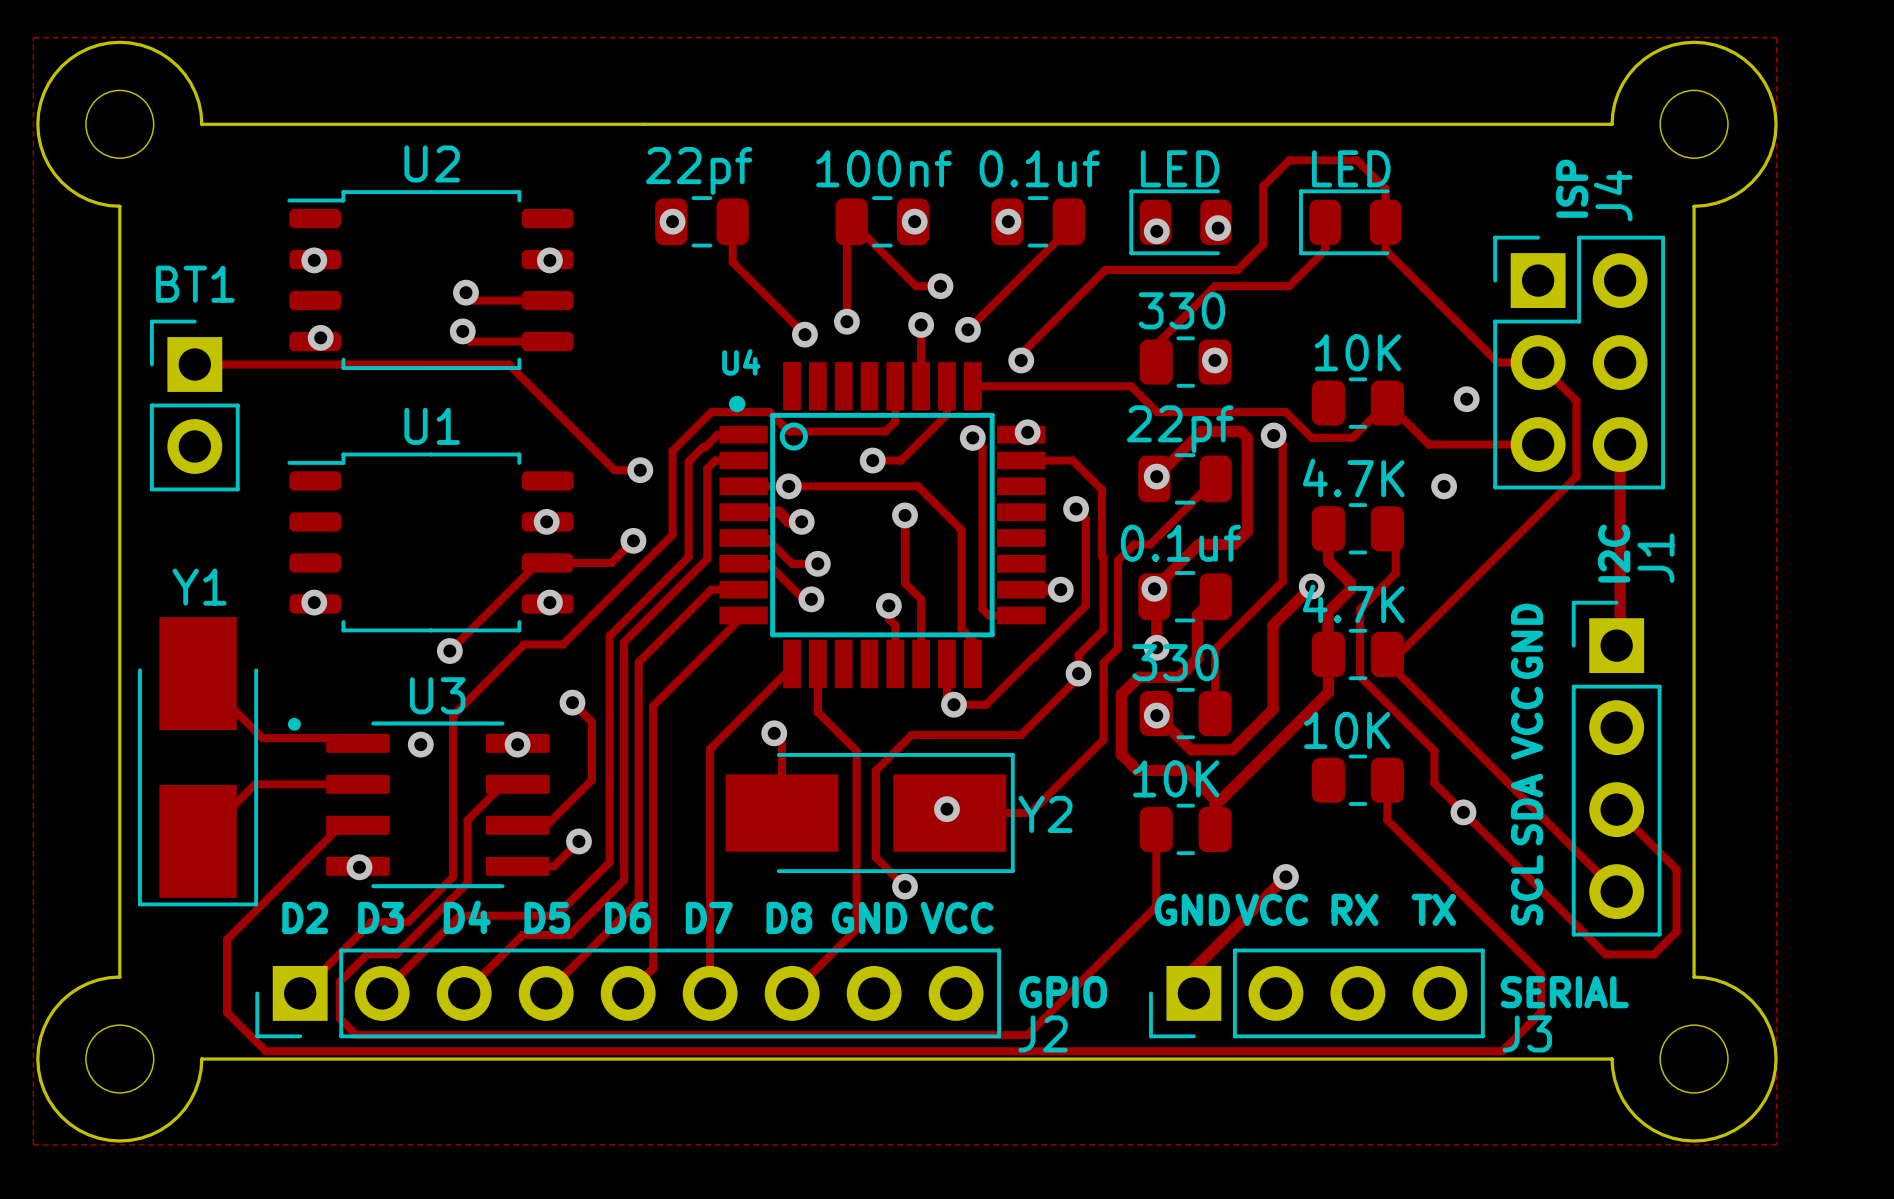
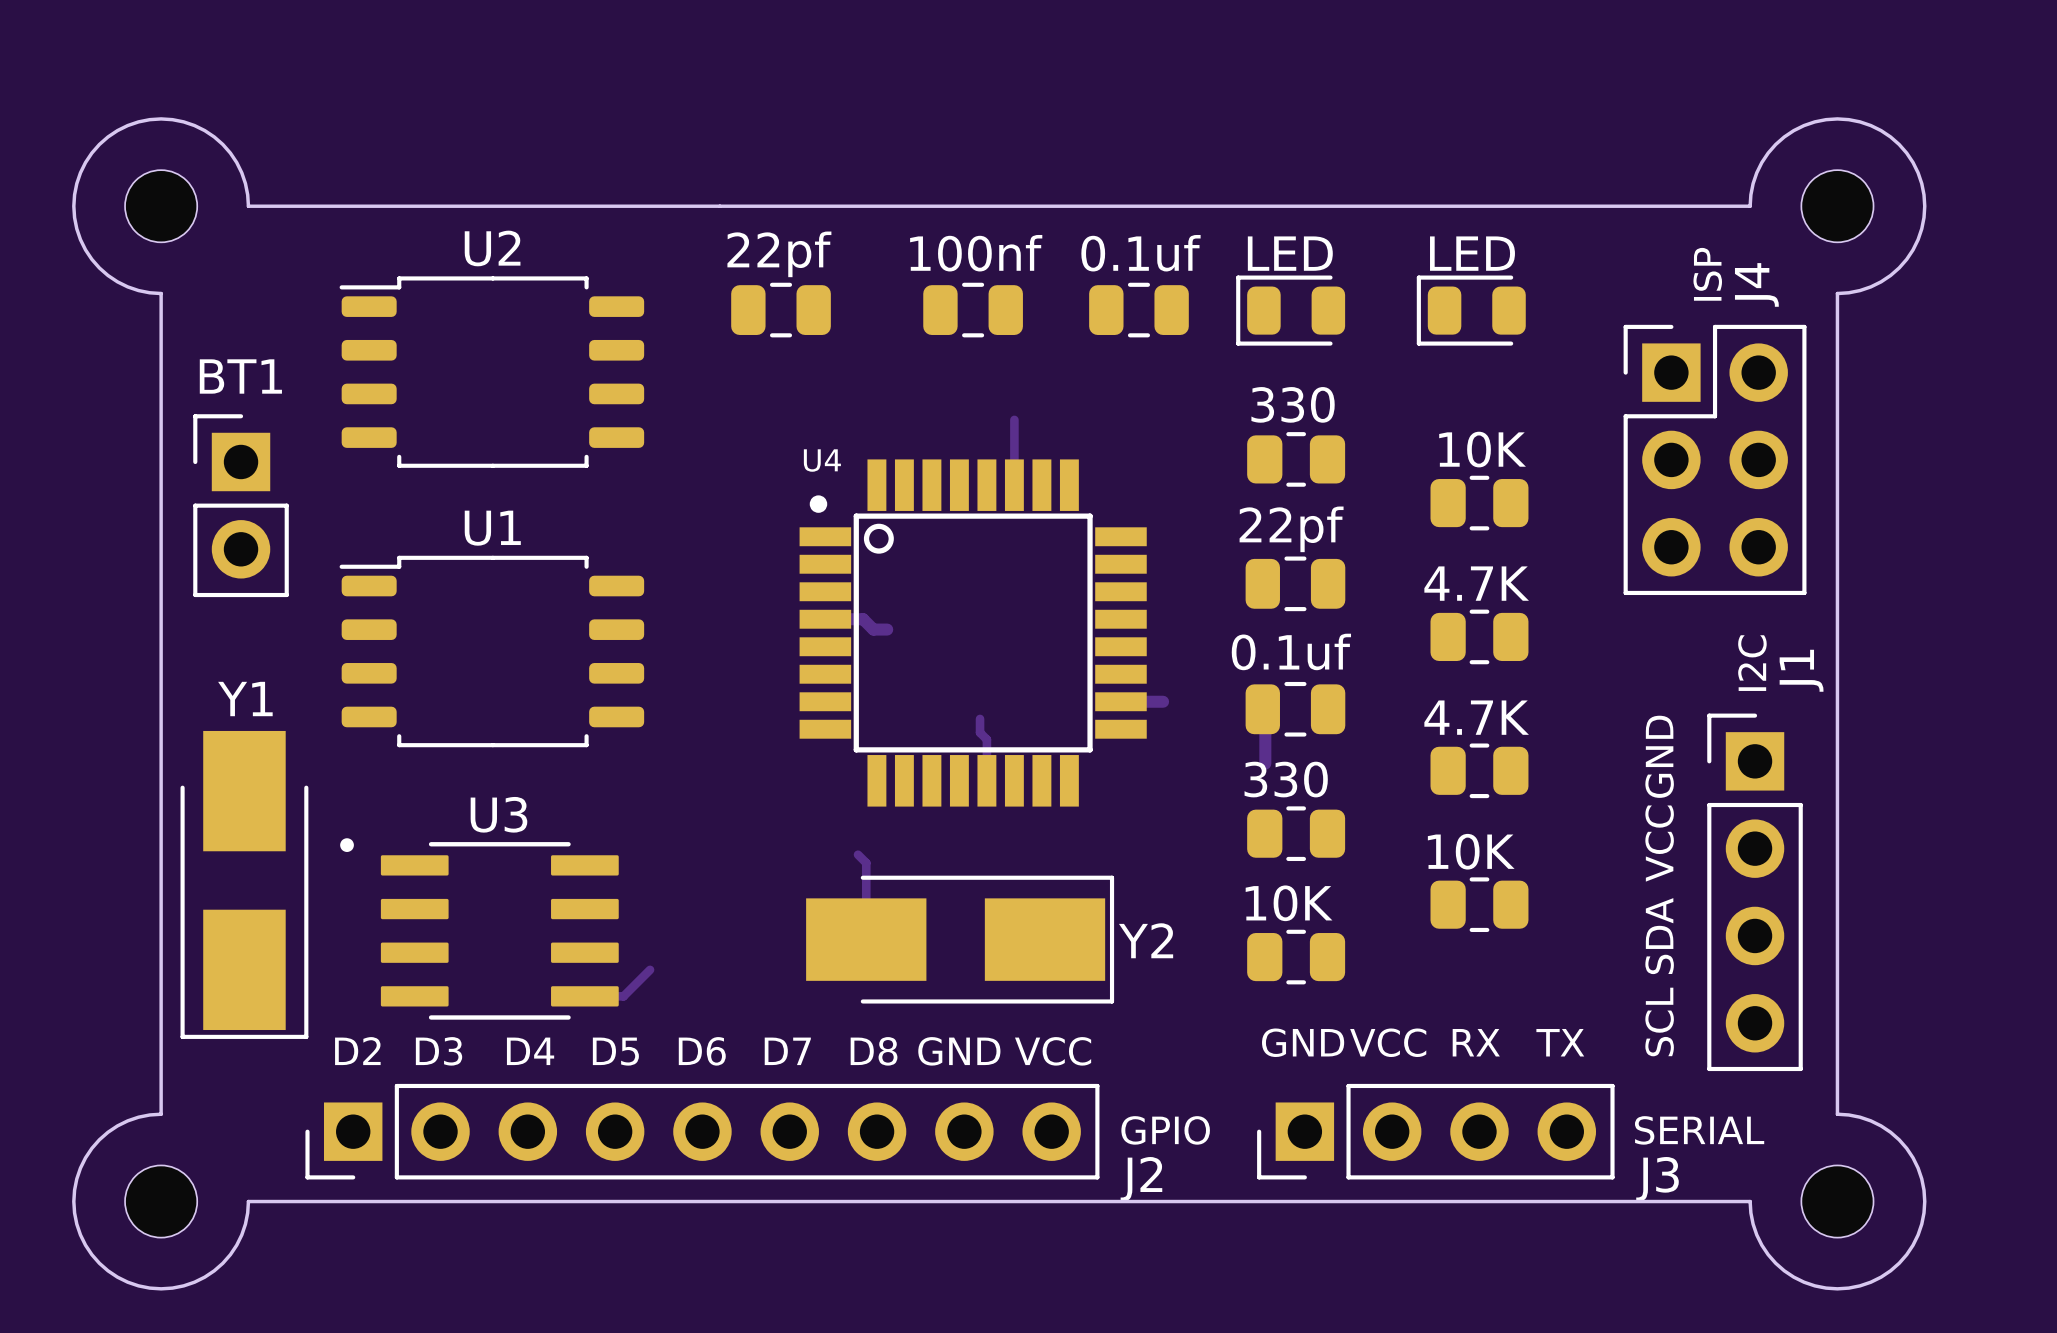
zone outline: (33, 37) (33, 1144) (1776, 1144) (1776, 37) (33, 37) -> none
via: (672, 221) -> none
track: (732, 221) (732, 262) (804, 334) -> none
via: (914, 221) -> none
via: (1008, 221) -> none
track: (1068, 221) (1068, 228) (967, 329) -> none
track: (1325, 222) (1325, 250) (1289, 286) (1214, 286) (1156, 344) (1156, 362) -> none
via: (1218, 228) -> none
via: (1156, 231) -> none
via: (314, 260) -> none
via: (549, 260) -> none
track: (940, 286) (916, 286) (851, 221) (846, 226) (846, 321) -> none
via: (940, 286) -> none
track: (465, 292) (473, 300) (547, 300) -> none
via: (465, 292) -> none
via: (846, 321) -> none
via: (921, 324) -> none
via: (967, 329) -> none
track: (462, 331) (462, 334) (469, 341) (547, 341) -> none
via: (462, 331) -> none
via: (804, 334) -> none
via: (320, 337) -> none
track: (1021, 360) (1021, 354) (1105, 270) (1237, 270) (1263, 244) (1263, 186) (1289, 160) (1356, 160) (1385, 189) (1385, 250) (1497, 362) (1538, 362) (1576, 400) (1576, 476) (1398, 654) (1387, 654) (1387, 662) (1616, 891) -> none
via: (1021, 360) -> none
via: (1214, 360) -> none
track: (194, 364) (508, 364) (614, 470) (640, 470) -> none
track: (895, 386) (895, 421) (885, 431) (788, 431) (769, 412) (711, 412) (672, 450) (672, 534) (562, 644) (524, 644) (453, 715) (453, 876) (407, 922) (371, 922) (300, 993) -> none
track: (946, 386) (946, 414) (900, 460) (872, 460) -> none
track: (972, 386) (1131, 386) (1157, 412) (1285, 412) (1311, 437) (1352, 437) (1387, 403) (1428, 444) (1538, 444) -> none
via: (1466, 399) -> none
via: (1027, 432) -> none
track: (743, 434) (717, 434) (688, 461) (688, 557) (609, 636) (609, 862) (556, 915) (459, 915) (382, 993) -> none
track: (1273, 435) (1282, 444) (1282, 581) (1215, 649) (1215, 713) -> none
via: (1273, 435) -> none
track: (972, 437) (982, 447) (982, 609) (988, 615) (1021, 615) -> none
via: (972, 437) -> none
track: (1620, 444) (1620, 642) (1616, 645) -> none
track: (743, 460) (715, 460) (707, 468) (707, 558) (624, 642) (624, 880) (569, 935) (522, 935) (464, 993) -> none
via: (872, 460) -> none
track: (1021, 460) (1072, 460) (1101, 489) (1103, 630) (1078, 654) (1078, 677) (1021, 734) (911, 734) (875, 770) (875, 857) (905, 886) -> none
via: (640, 470) -> none
via: (1156, 476) -> none
track: (1154, 478) (1201, 431) (1240, 431) (1247, 437) (1247, 531) (1234, 544) (1198, 544) (1154, 588) (1154, 596) -> none
track: (1215, 478) (1150, 544) (1134, 544) (1118, 560) (1118, 648) (1103, 663) (1103, 739) (1030, 813) (949, 813) -> none
track: (743, 486) (917, 486) (961, 529) (961, 629) (972, 640) (972, 663) -> none
via: (788, 486) -> none
via: (1444, 486) -> none
track: (1076, 508) (1085, 518) (1085, 605) (986, 704) (953, 704) (946, 697) (946, 663) -> none
via: (1076, 508) -> none
track: (905, 515) (905, 583) (921, 599) (921, 663) -> none
via: (905, 515) -> none
via: (546, 521) -> none
via: (801, 521) -> none
track: (1328, 528) (1328, 561) (1350, 583) (1350, 589) (1327, 612) (1328, 692) (1215, 805) -> none
track: (1387, 528) (1395, 537) (1395, 573) (1360, 609) (1360, 676) (1434, 750) (1434, 783) (1605, 954) (1653, 954) (1676, 931) (1676, 869) (1616, 809) -> none
track: (743, 538) (766, 538) (792, 563) (817, 563) -> none
track: (633, 540) (611, 562) (537, 562) (449, 650) -> none
via: (633, 540) -> none
track: (743, 563) (768, 563) (803, 599) (811, 599) -> none
via: (817, 563) -> none
track: (1311, 586) (1273, 625) (1273, 709) (1232, 749) (1191, 749) (1156, 715) -> none
via: (1311, 586) -> none
via: (1154, 588) -> none
track: (743, 589) (711, 589) (638, 662) (638, 900) (546, 993) -> none
via: (1060, 589) -> none
track: (1215, 596) (1197, 615) (1197, 658) (1178, 677) (1138, 677) (1121, 694) (1121, 754) (1137, 770) (1185, 770) (1215, 799) (1215, 829) -> none
via: (811, 599) -> none
via: (314, 602) -> none
via: (549, 602) -> none
via: (888, 605) -> none
track: (743, 615) (653, 705) (653, 968) (628, 993) -> none
via: (1156, 647) -> none
via: (449, 650) -> none
track: (792, 663) (792, 667) (710, 748) (710, 993) -> none
track: (817, 663) (817, 712) (856, 751) (856, 928) (792, 993) -> none
track: (198, 673) (262, 738) (352, 738) (357, 743) -> none
via: (1078, 673) -> none
track: (572, 702) (591, 722) (591, 780) (546, 825) (517, 825) -> none
via: (572, 702) -> none
via: (953, 704) -> none
via: (1156, 715) -> none
via: (774, 733) -> none
via: (420, 744) -> none
via: (517, 744) -> none
track: (1387, 780) (1387, 820) (1540, 973) (1540, 1012) (1502, 1051) (265, 1051) (227, 1012) (227, 939) (341, 825) (357, 825) -> none
track: (357, 784) (255, 784) (198, 841) -> none
track: (517, 784) (503, 784) (467, 820) (467, 882) (396, 954) (367, 954) (340, 981) (340, 1018) (356, 1035) (1027, 1035) (1156, 906) (1156, 829) -> none
via: (946, 809) -> none
via: (1463, 812) -> none
via: (578, 841) -> none
via: (359, 867) -> none
track: (1285, 876) (1193, 968) (1193, 993) -> none
via: (1285, 876) -> none
via: (905, 886) -> none

